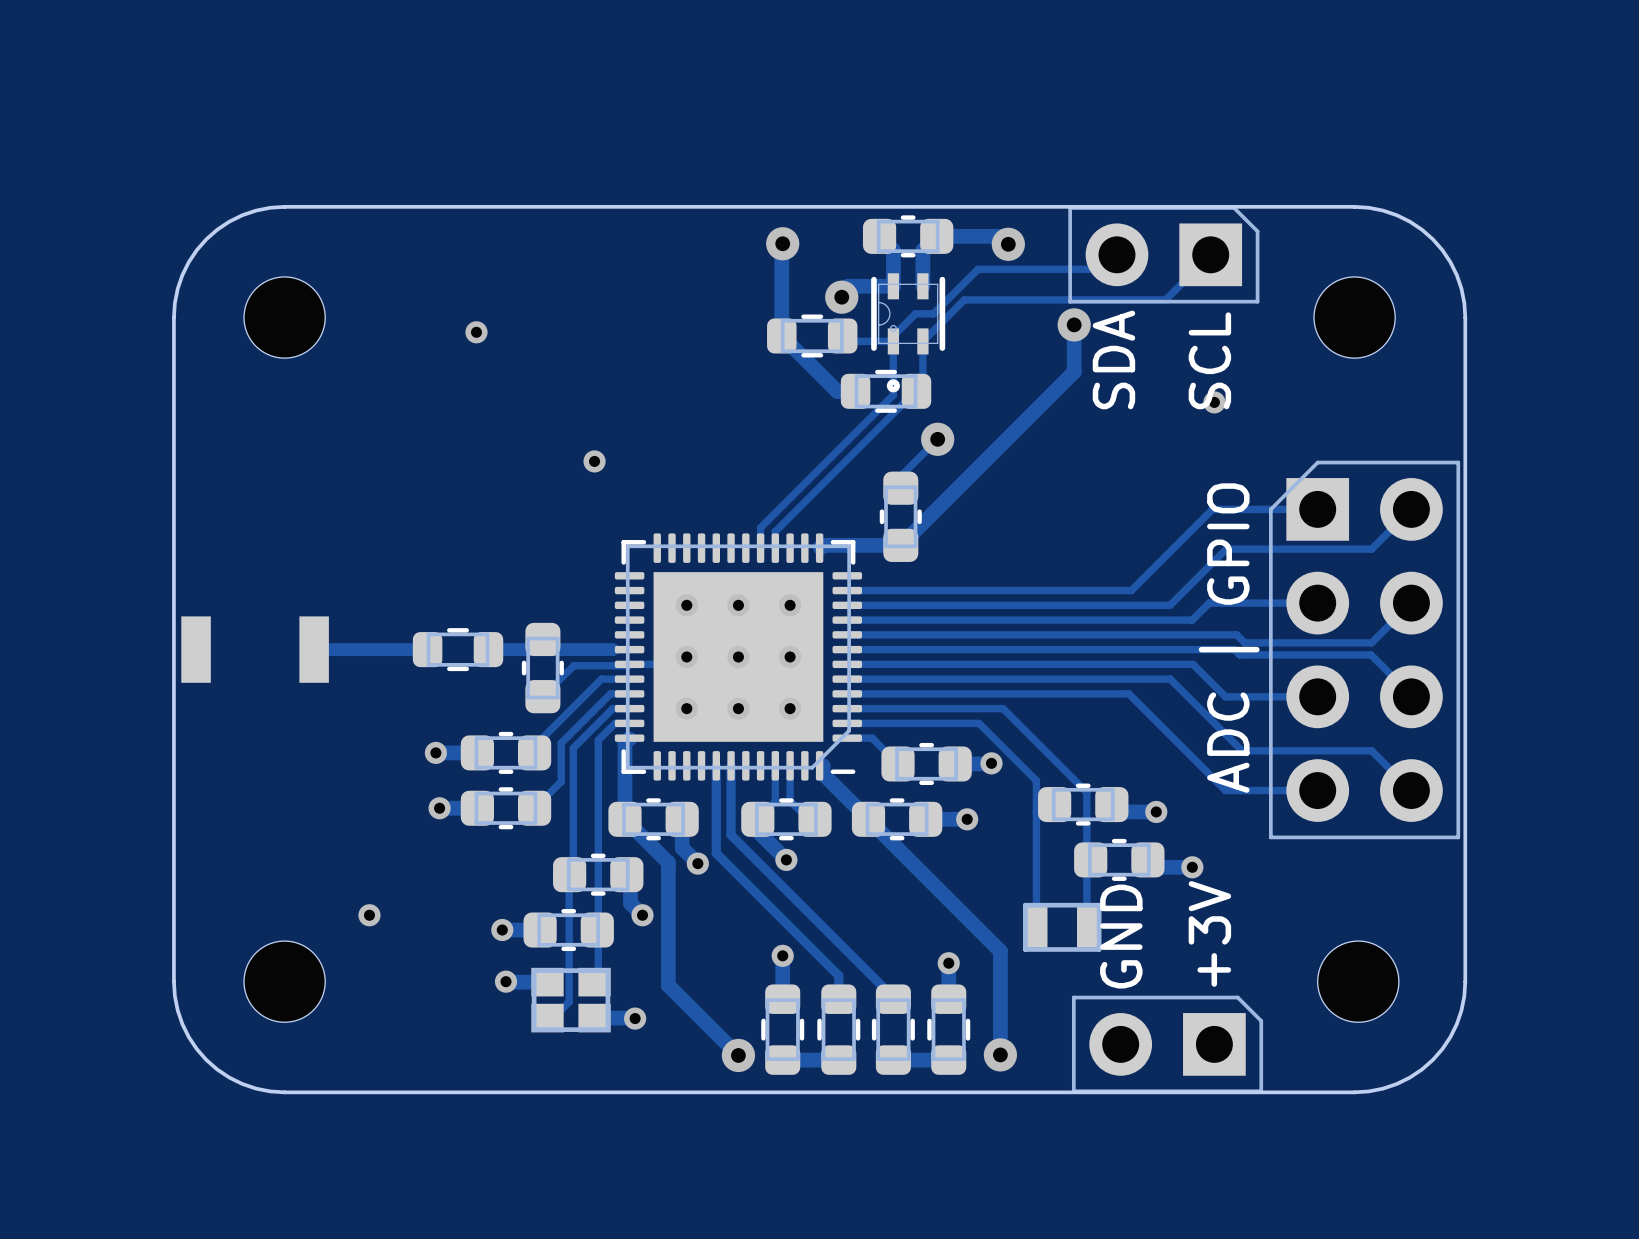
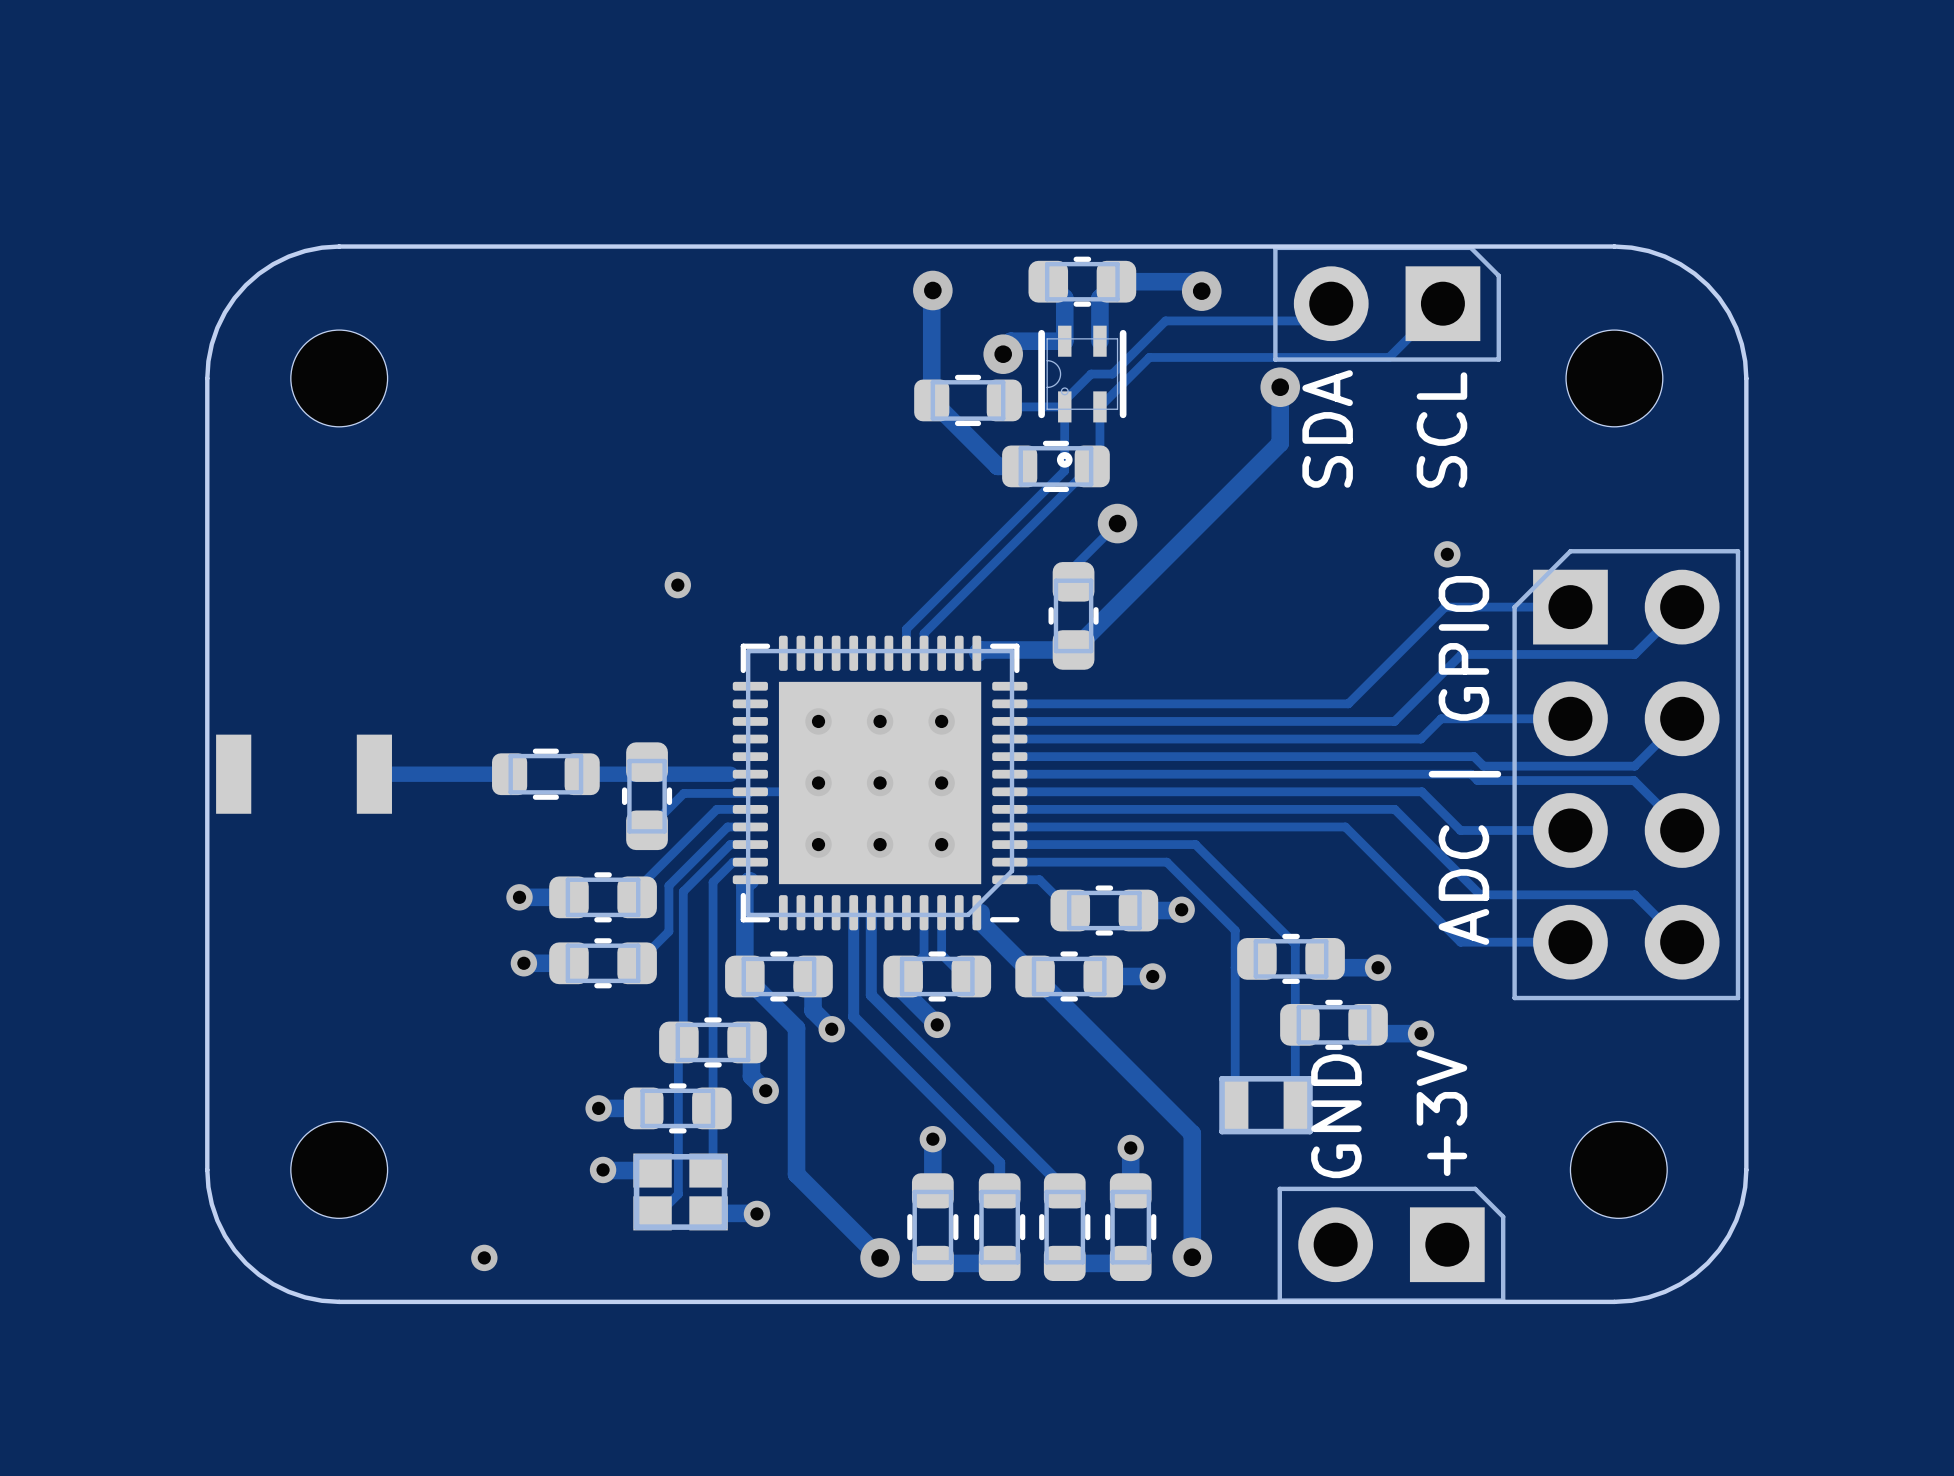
via: (476, 332) -> none
via position: (1214, 402) -> (1447, 554)
via position: (594, 461) -> (677, 585)
via position: (369, 915) -> (484, 1257)

